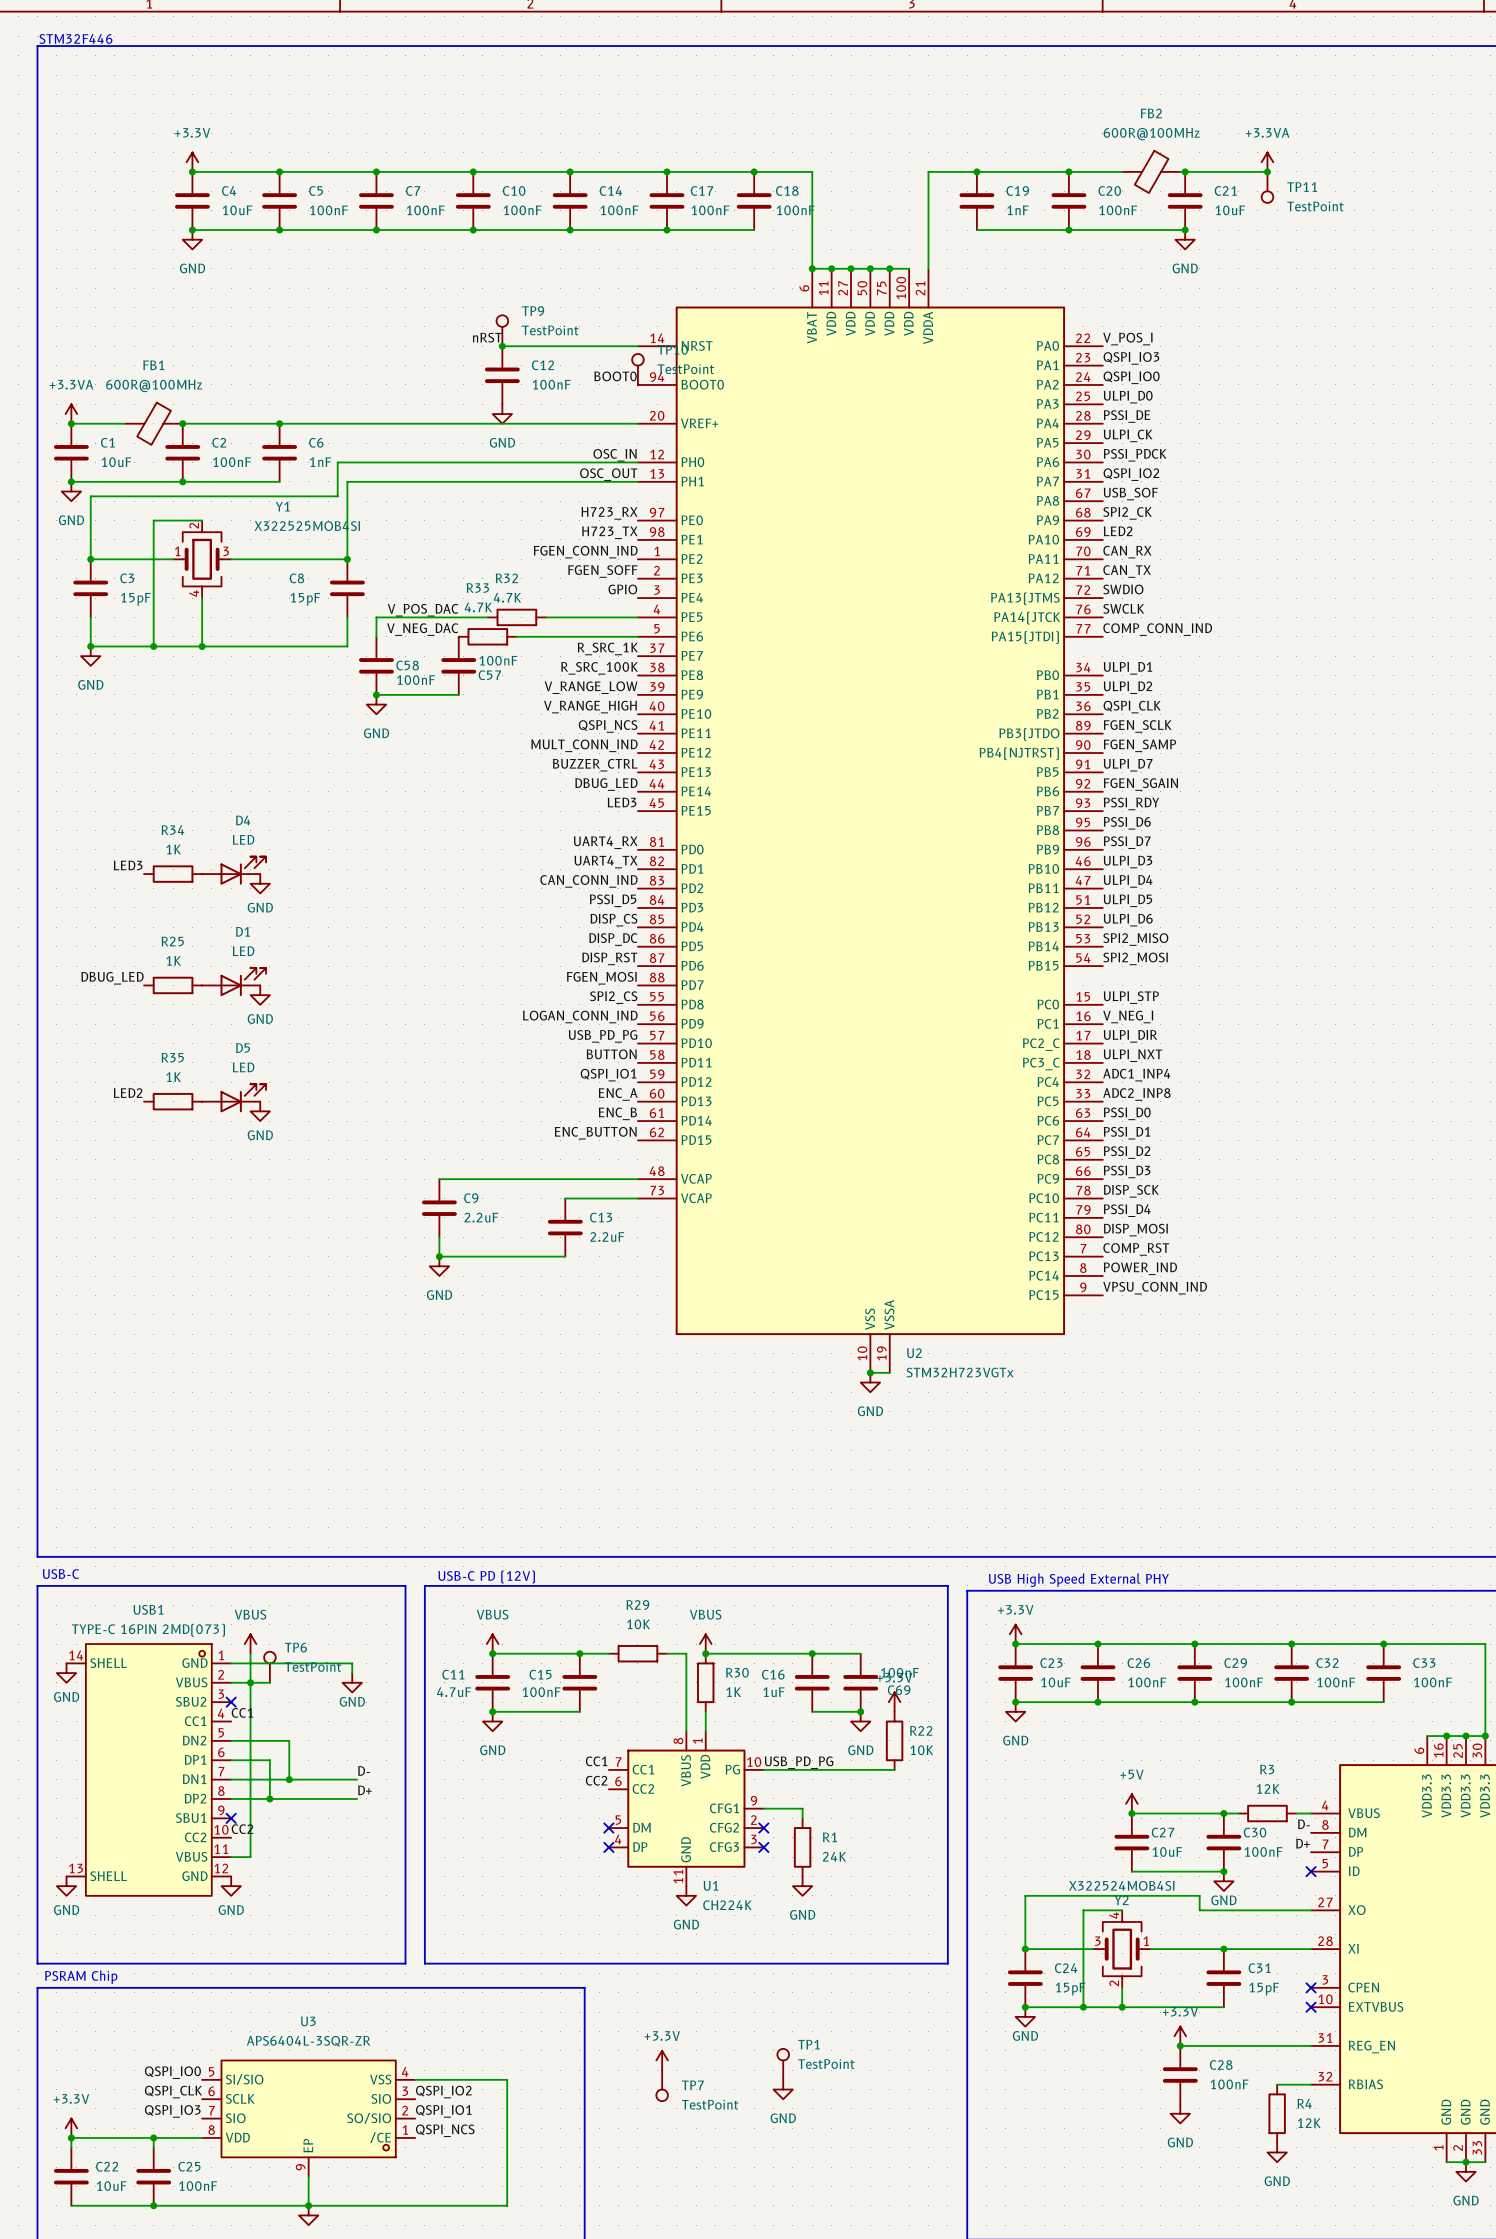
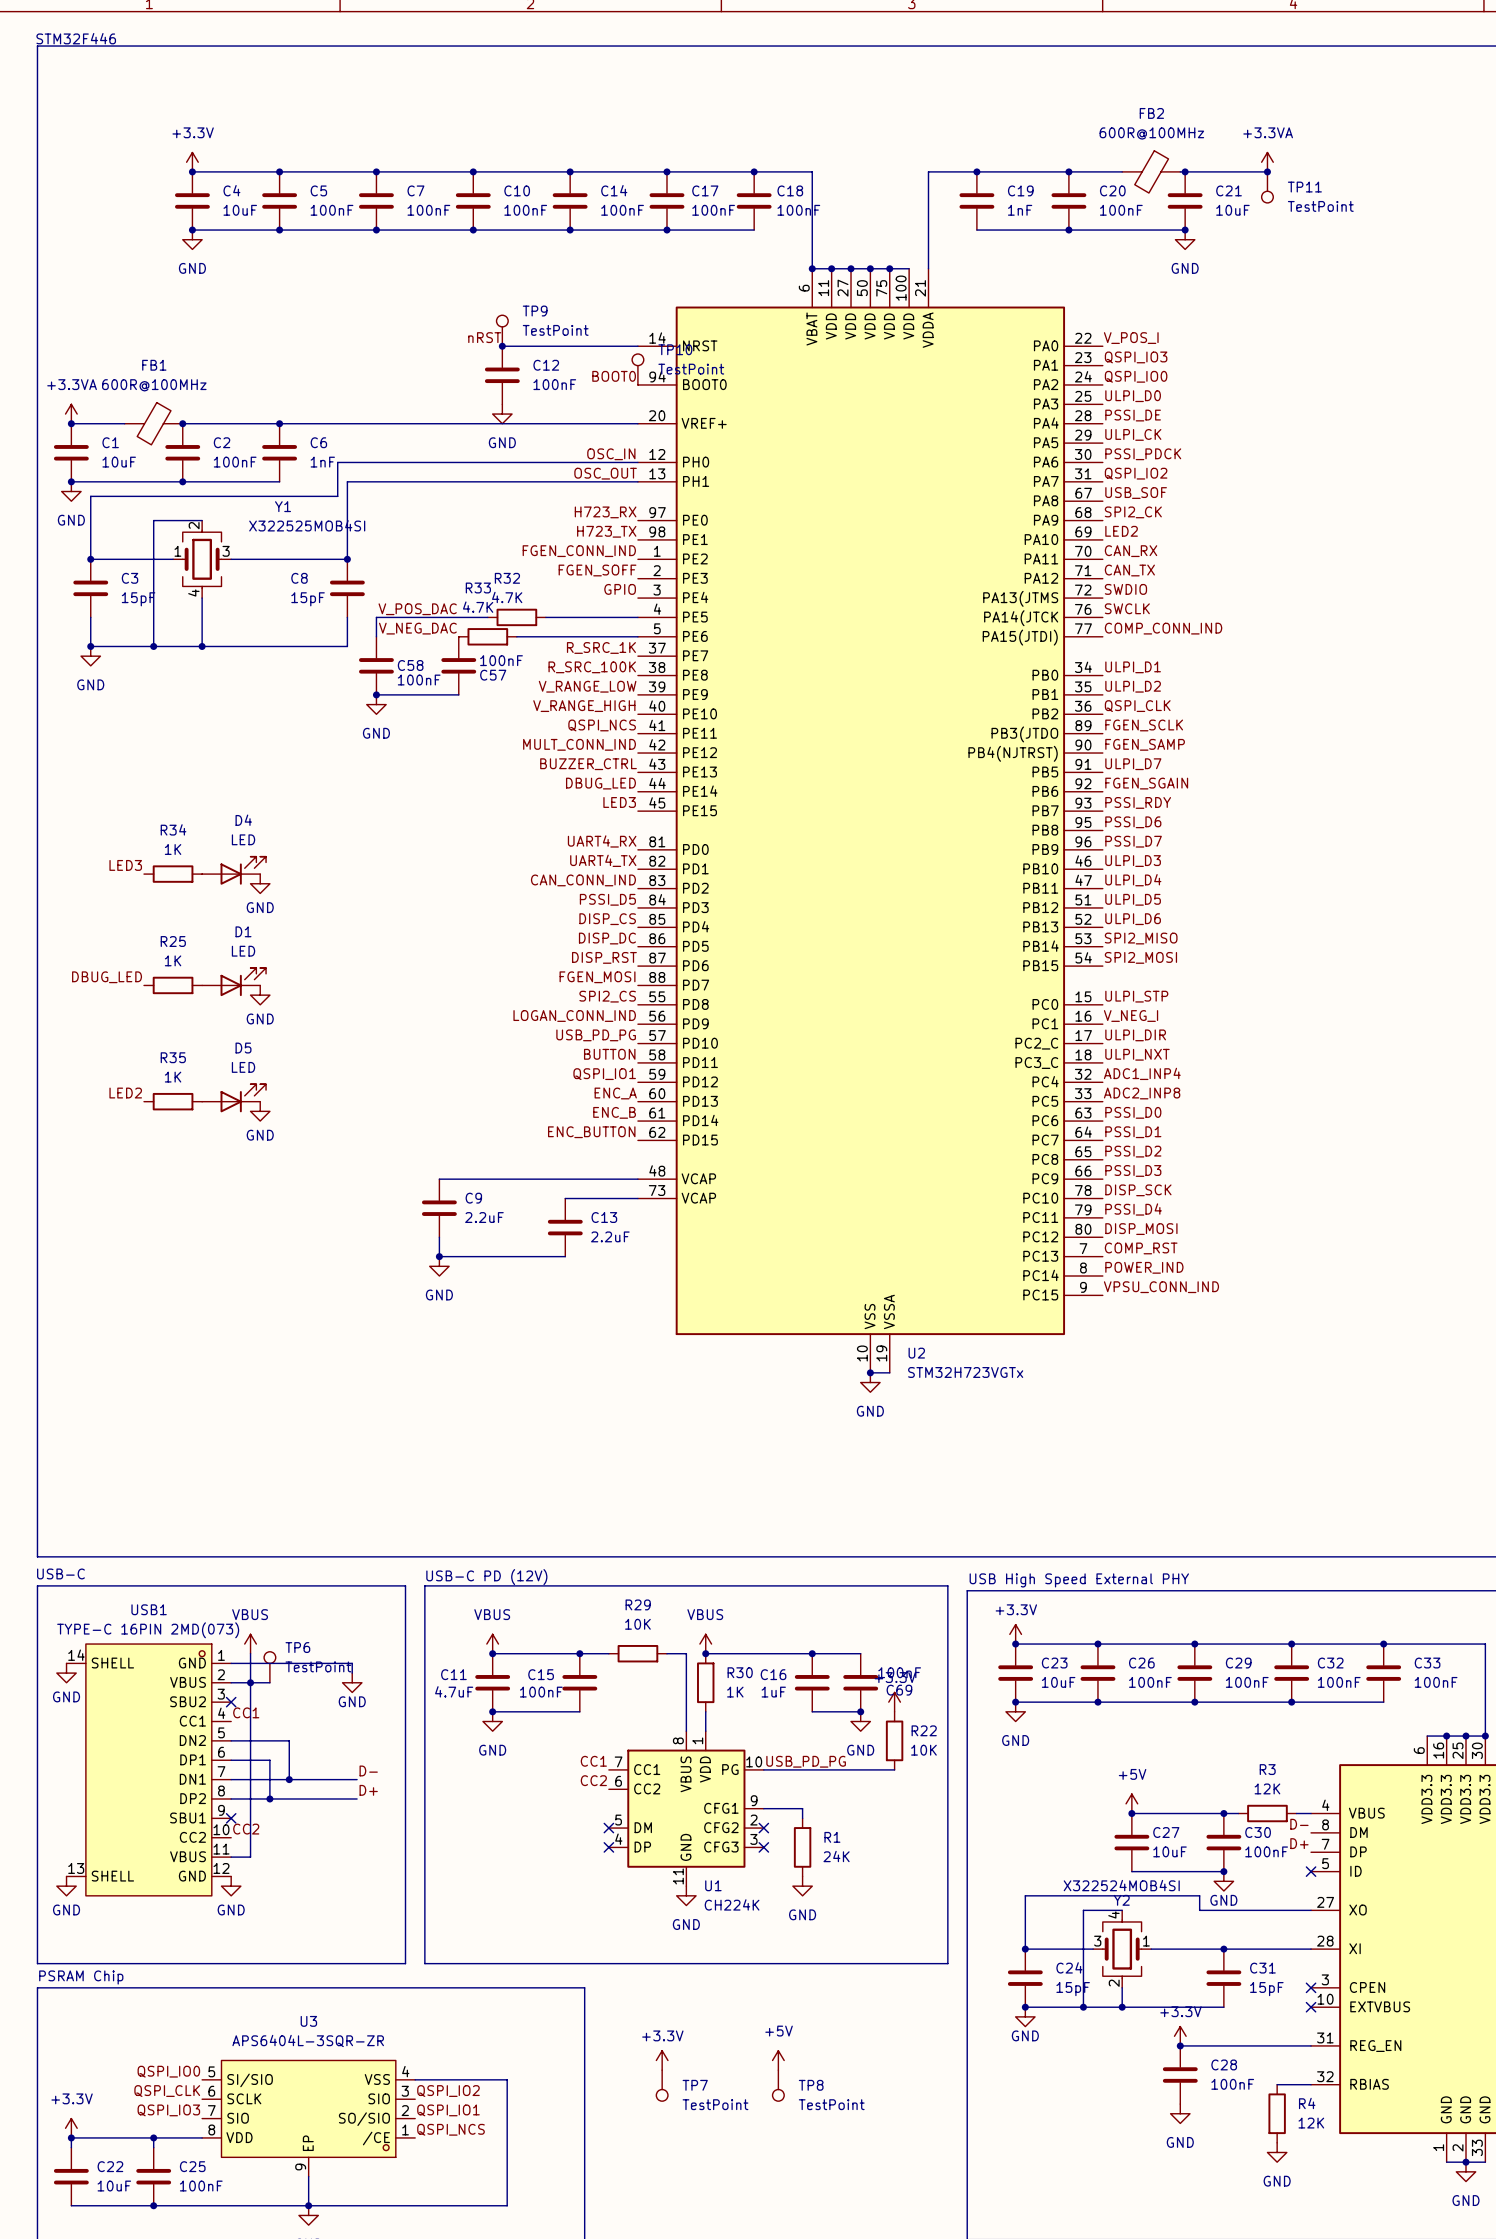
power symbol: none -> +5V (778, 2060)
TP1: TestPoint (783, 2064) -> none
TP8: none -> TestPoint (778, 2085)
power symbol: GND (783, 2089) -> none

